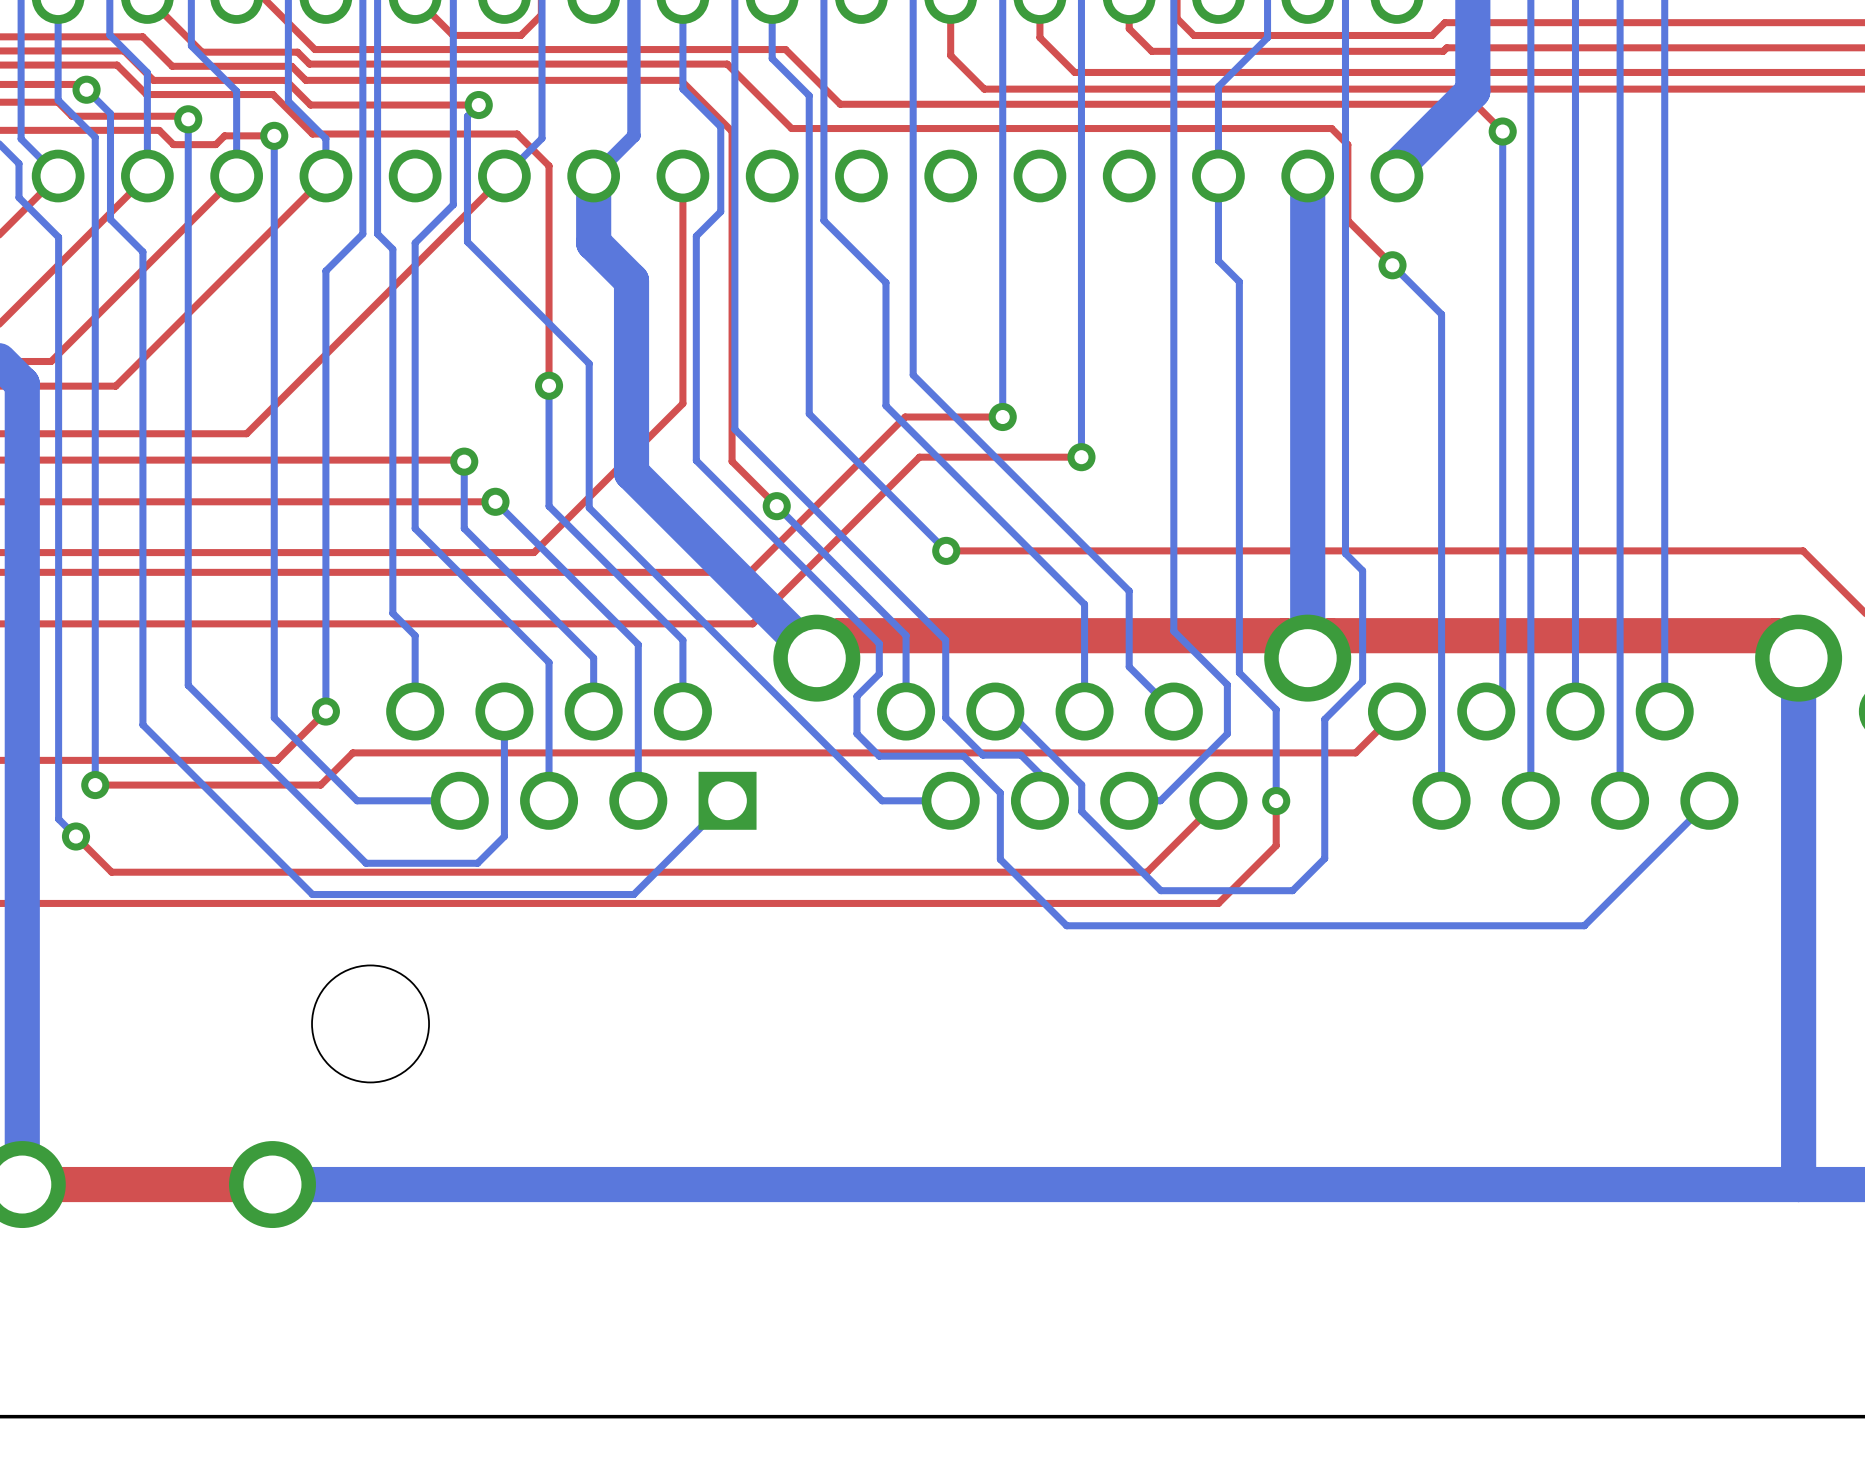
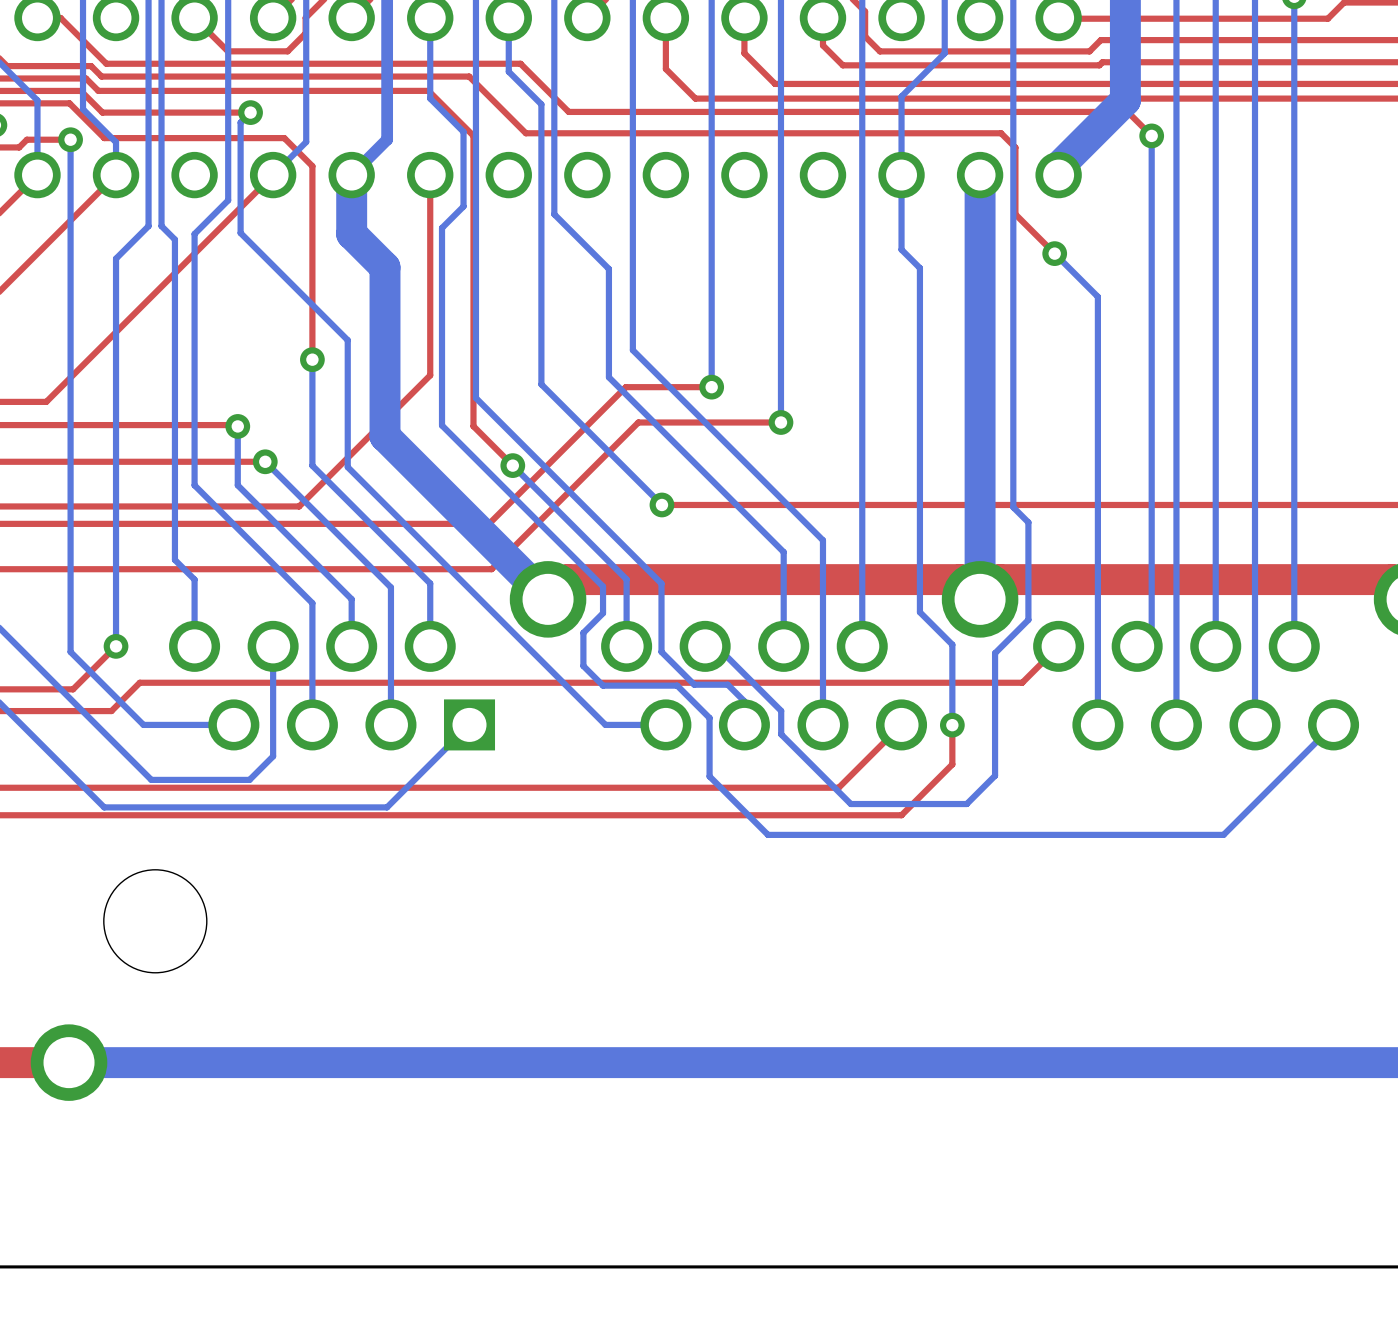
bottom track: (1173, 631) (1227, 684) (1227, 733) (1160, 800) (1129, 800) -> (822, 607) (822, 724)
bottom track: (1129, 666) (1173, 711) -> (862, 575) (862, 646)

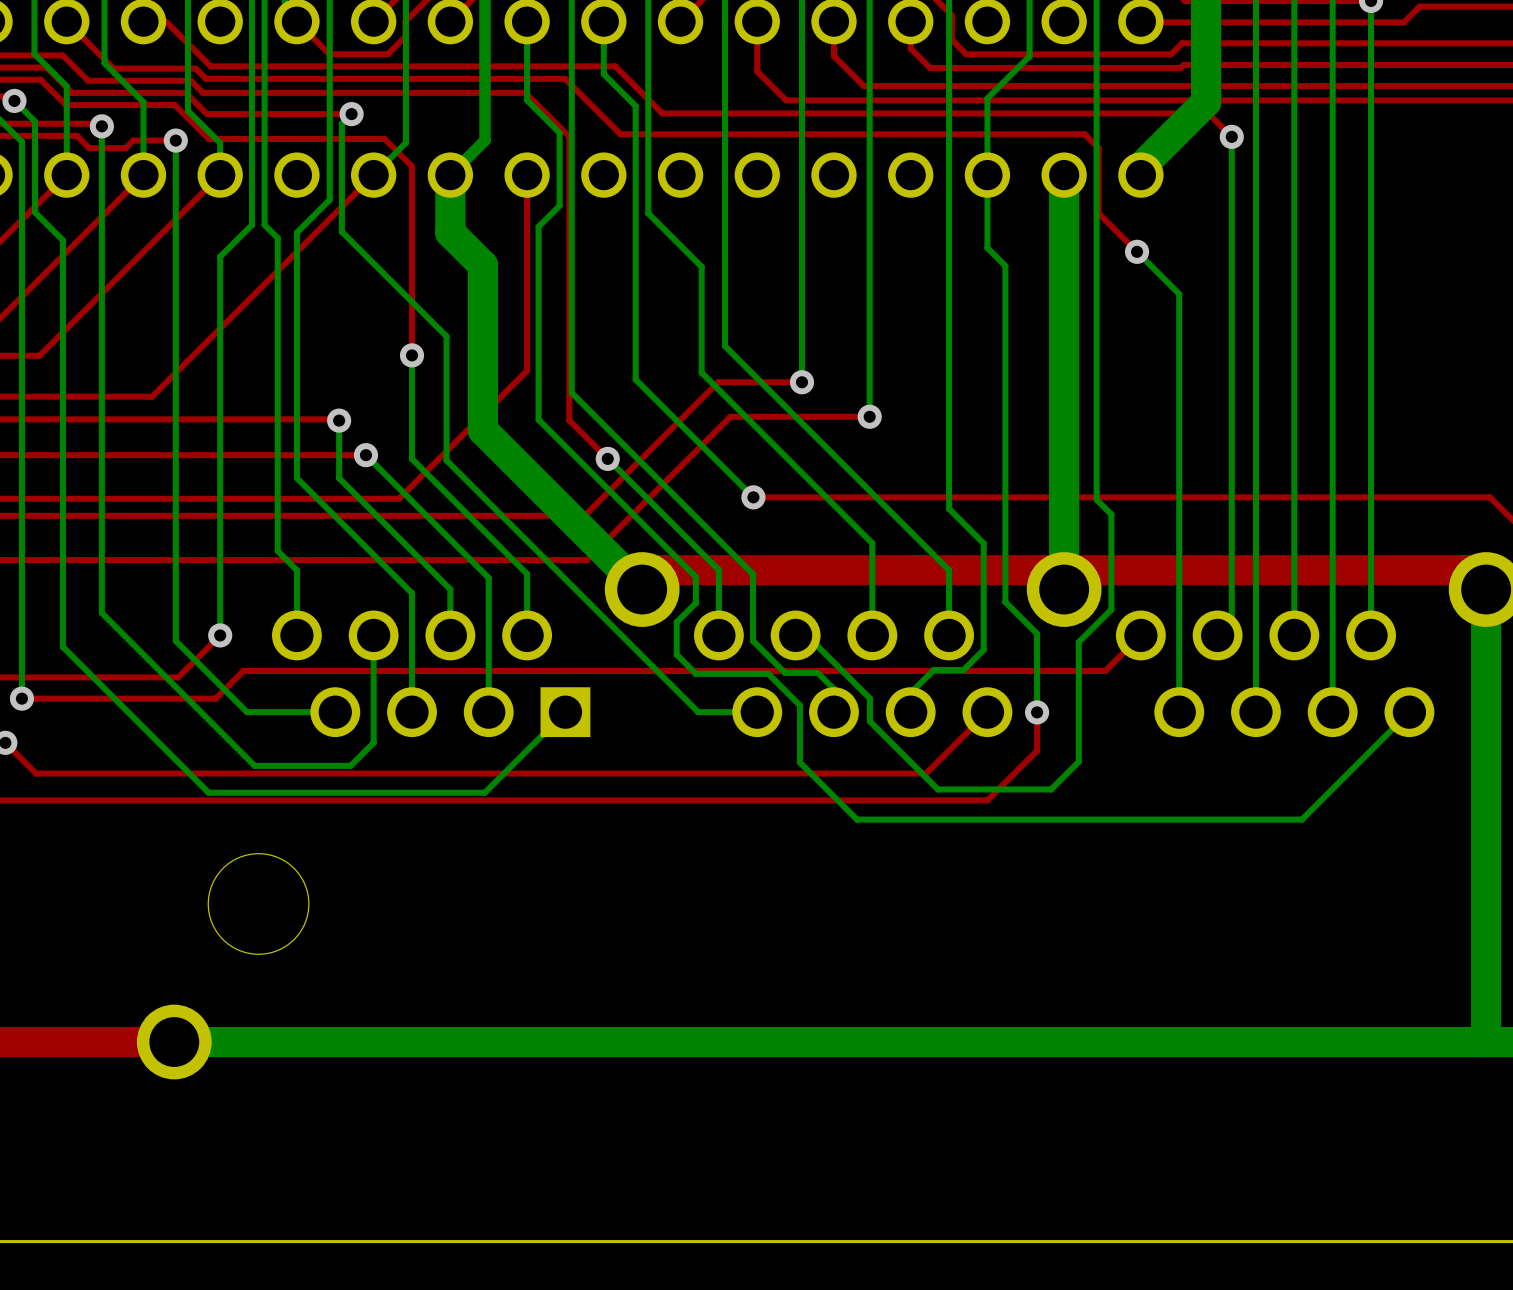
bottom track: (862, 516) (862, 579) -> (910, 531) (949, 570)
bottom track: none -> (949, 508) (983, 543) (983, 649) (963, 669) (933, 669) (910, 692)
bottom track: (822, 540) (822, 724) -> none

